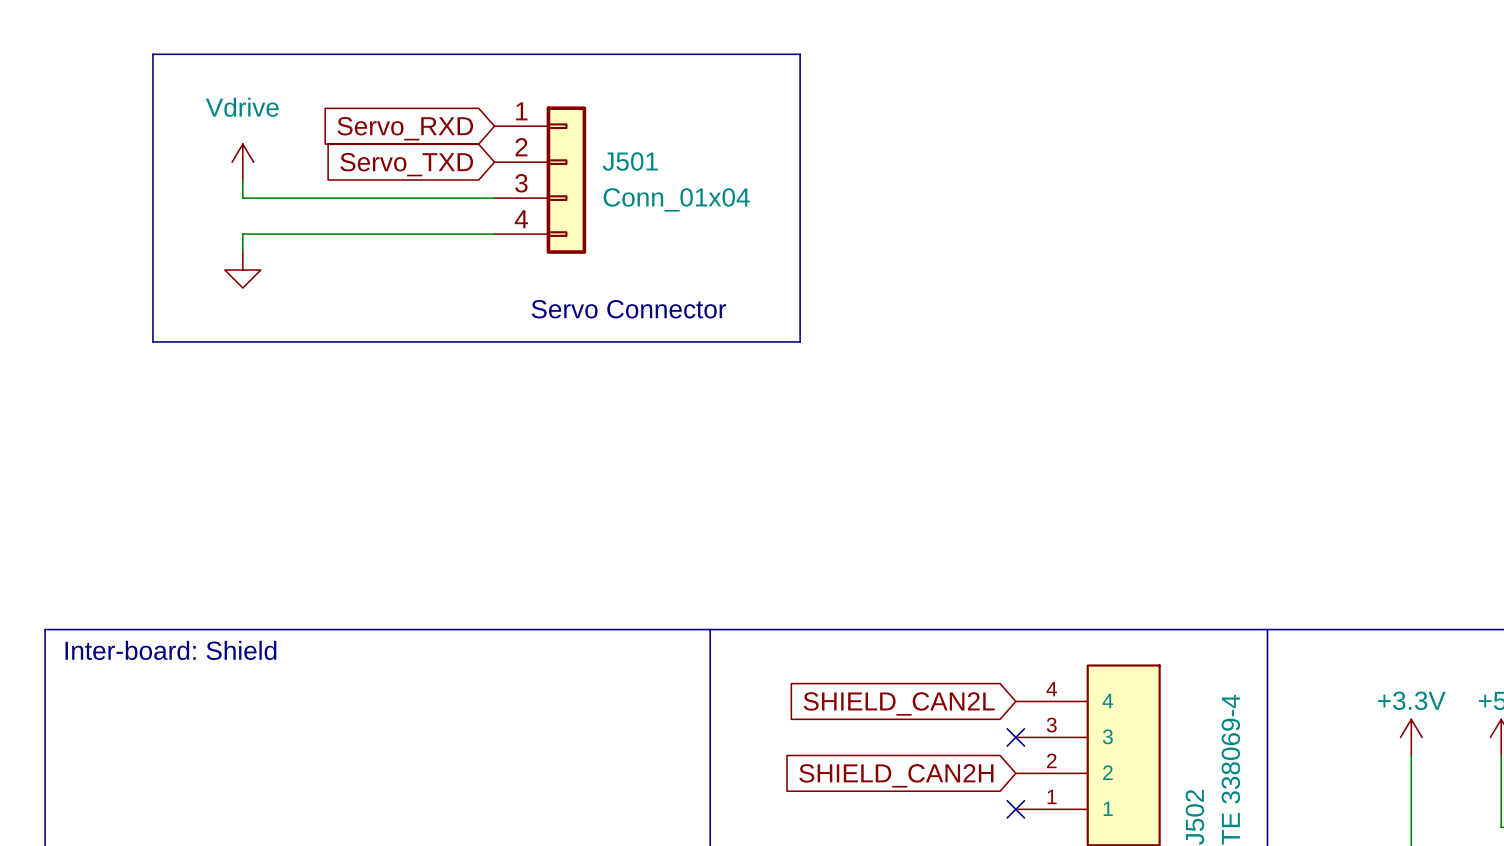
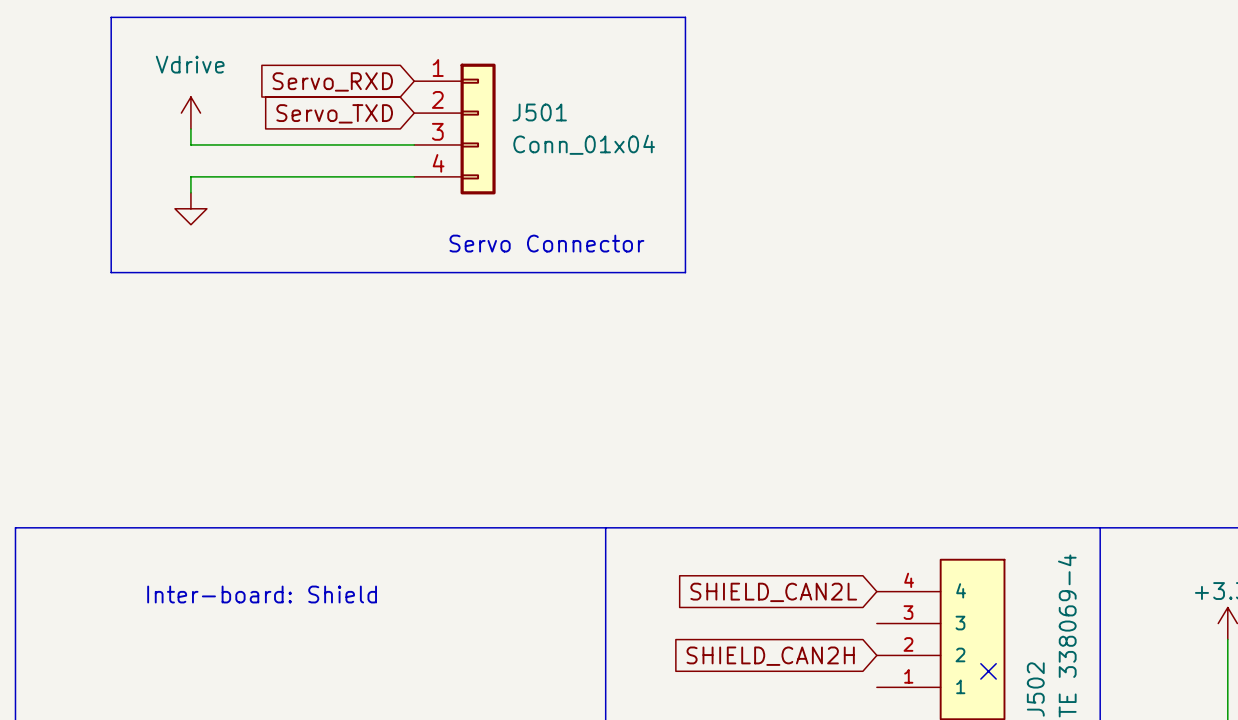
text position: Inter-board: Shield (170, 650) -> Inter-board: Shield (262, 594)
no-connect mark: (1015, 737) -> none
no-connect mark: none -> (988, 671)
no-connect mark: (1015, 809) -> none

